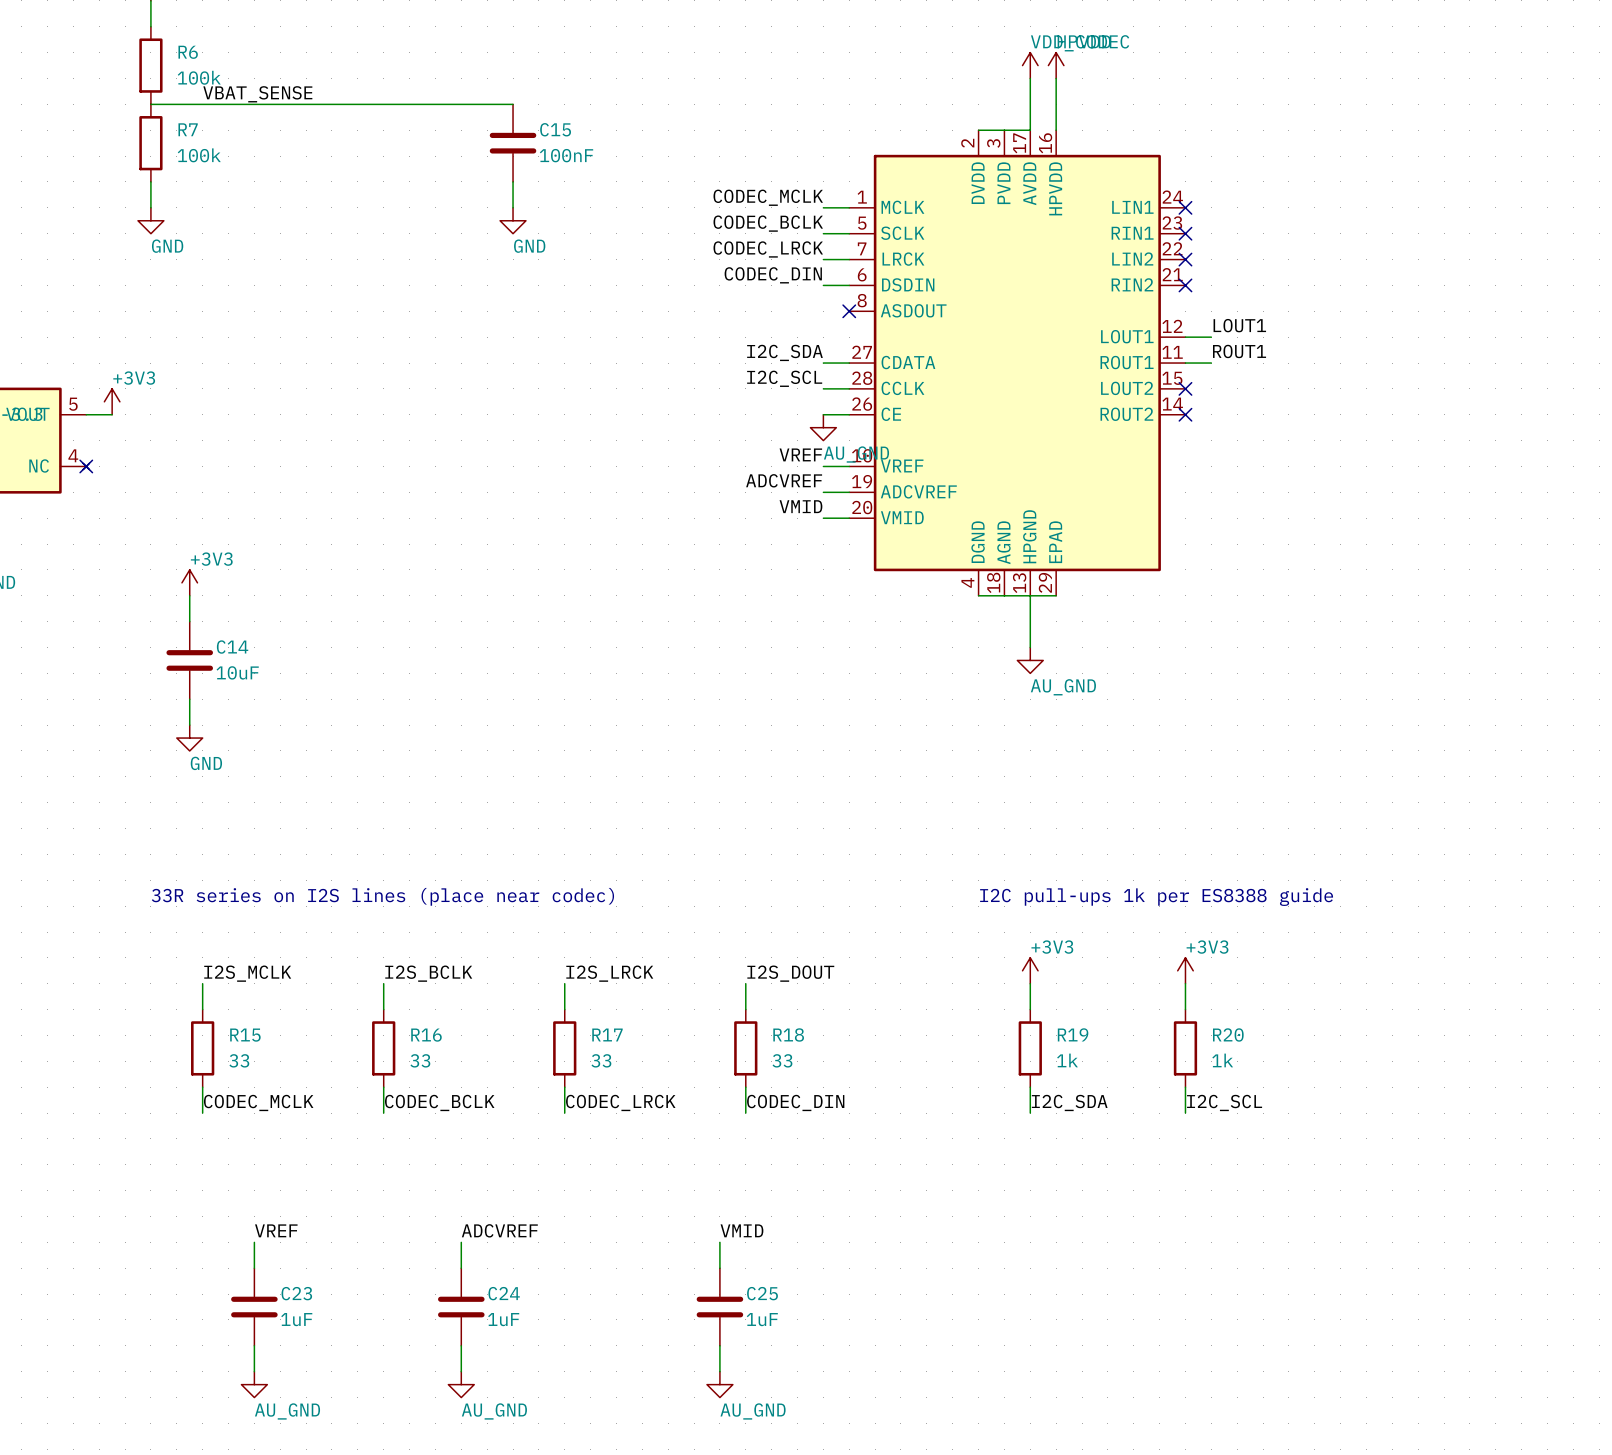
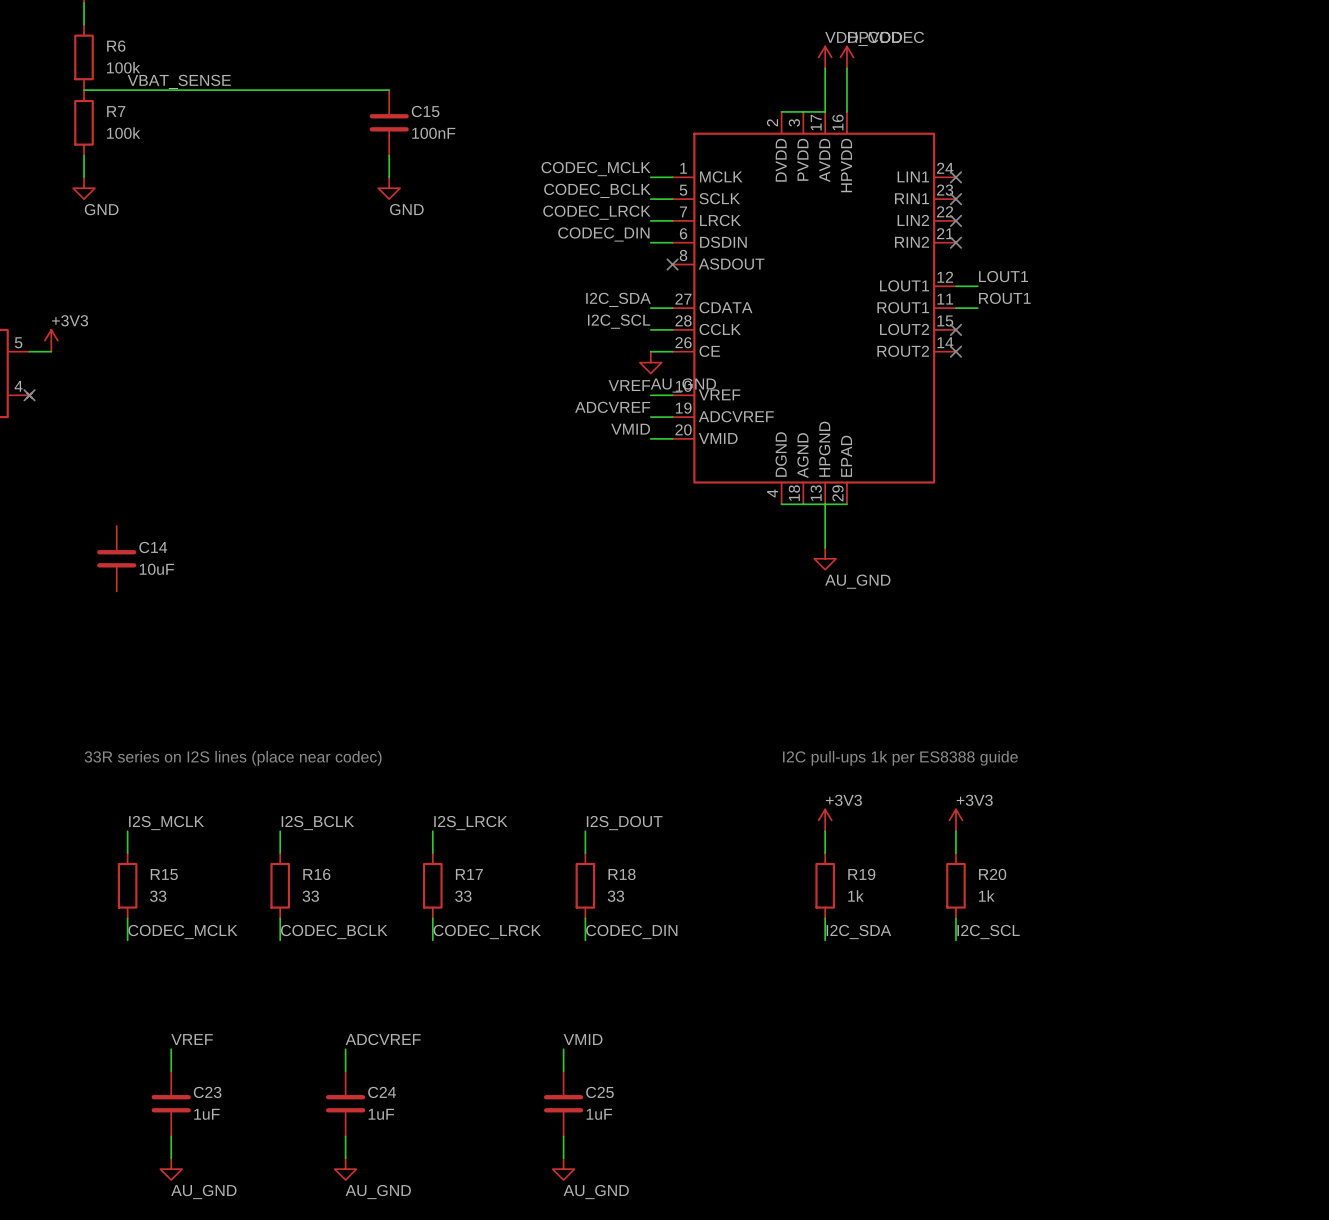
power symbol: +3V3 (189, 582) -> none
wire: (189, 595) (189, 621) -> none
wire: (189, 699) (189, 725) -> none
power symbol: GND (189, 738) -> none

